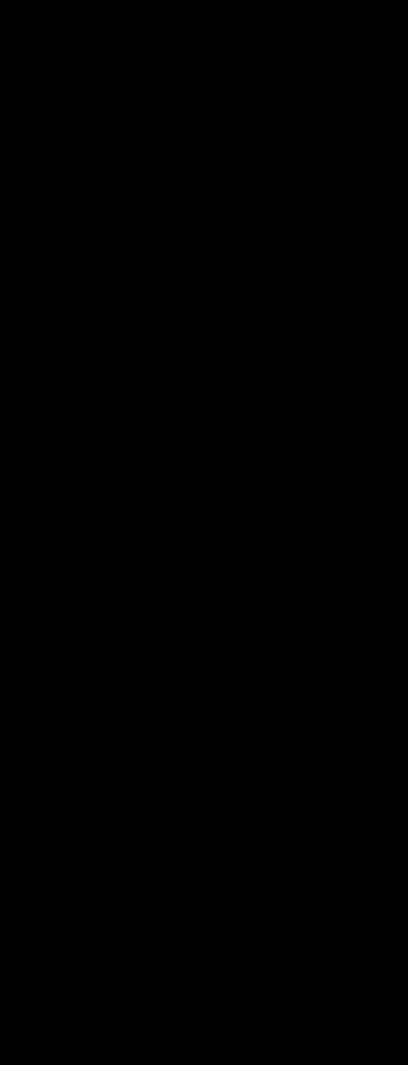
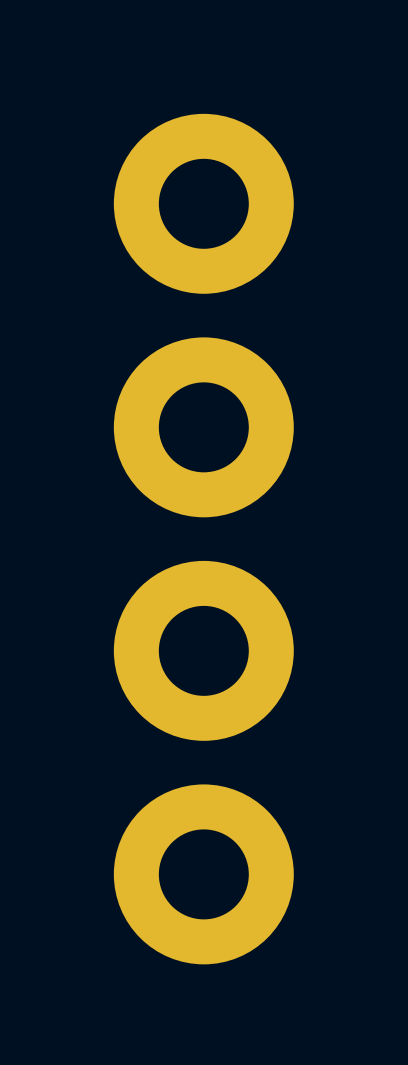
part: none -> (203, 203)
part: none -> (203, 427)
part: none -> (203, 650)
part: none -> (203, 874)

